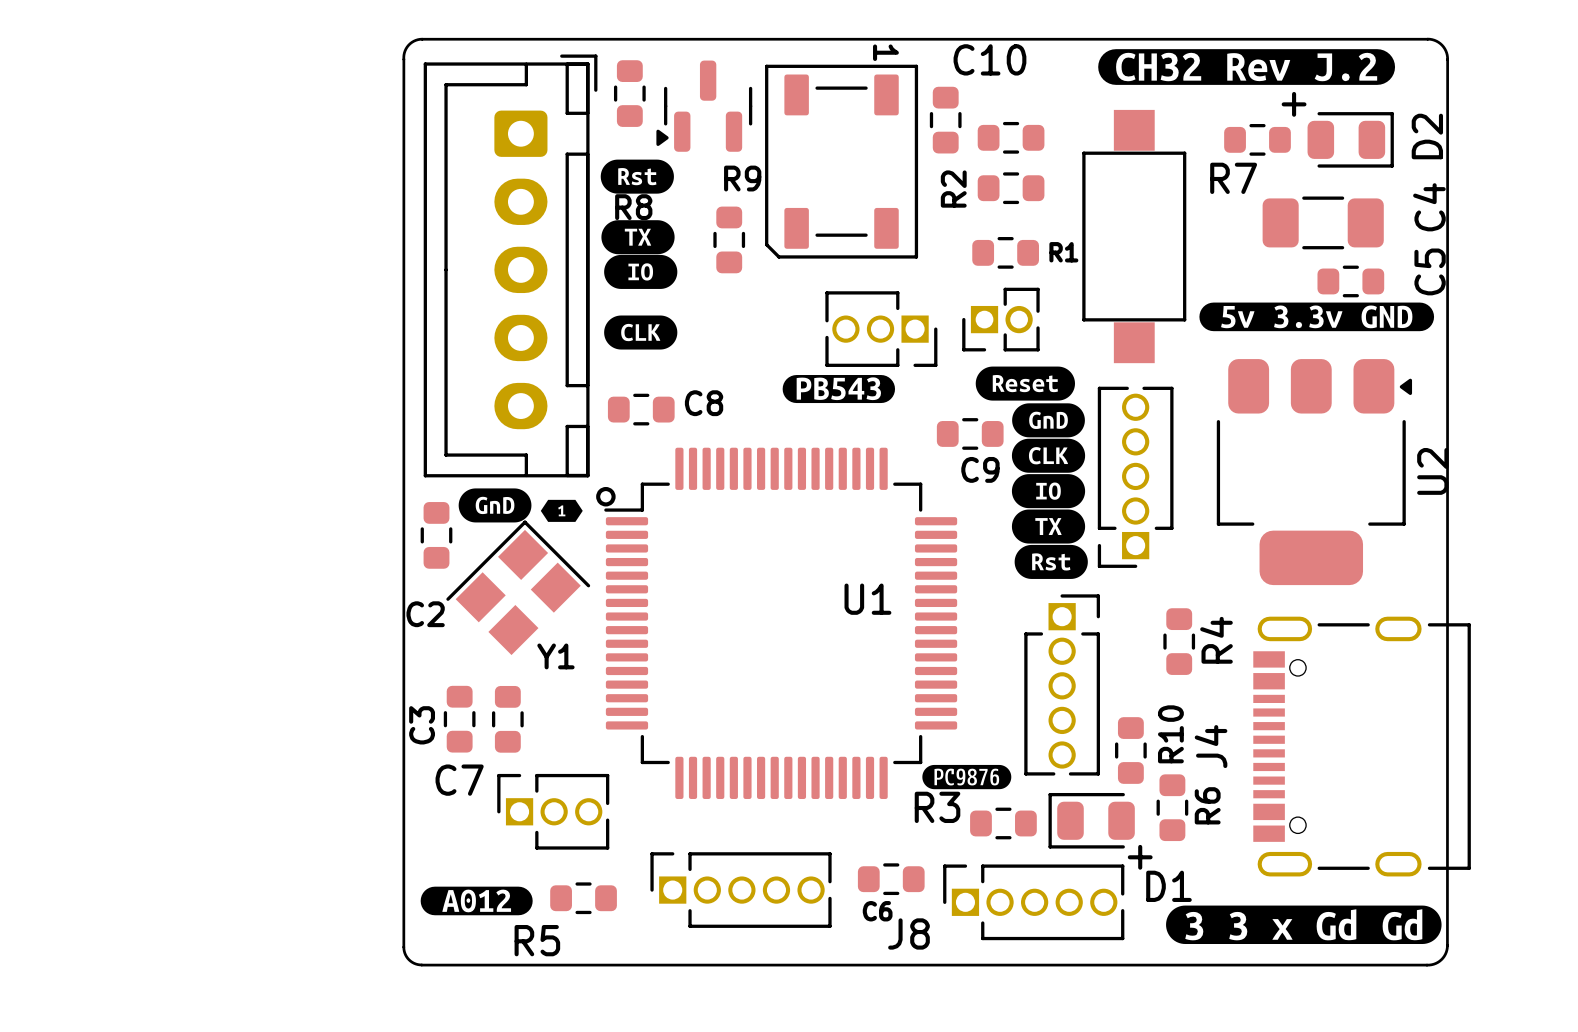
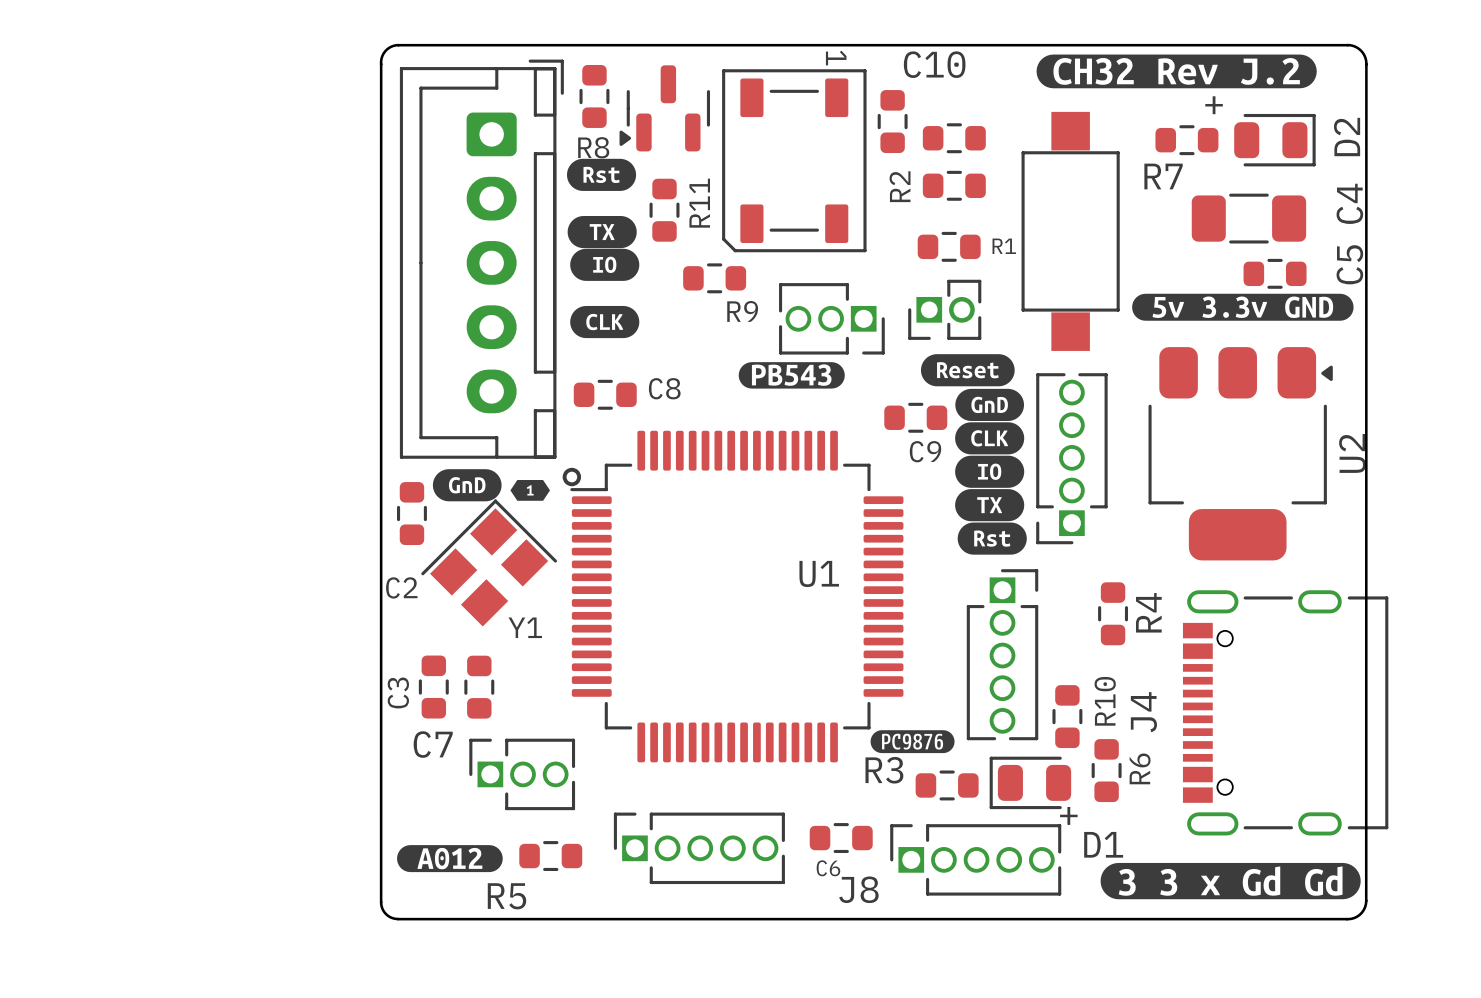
R8 name position: R8 (633, 207) -> R8 (593, 147)
R11: none -> (664, 210)
R9 rotation: 0° (729, 239) -> 90° clockwise (714, 278)
R9 position: (729, 239) -> (714, 278)

